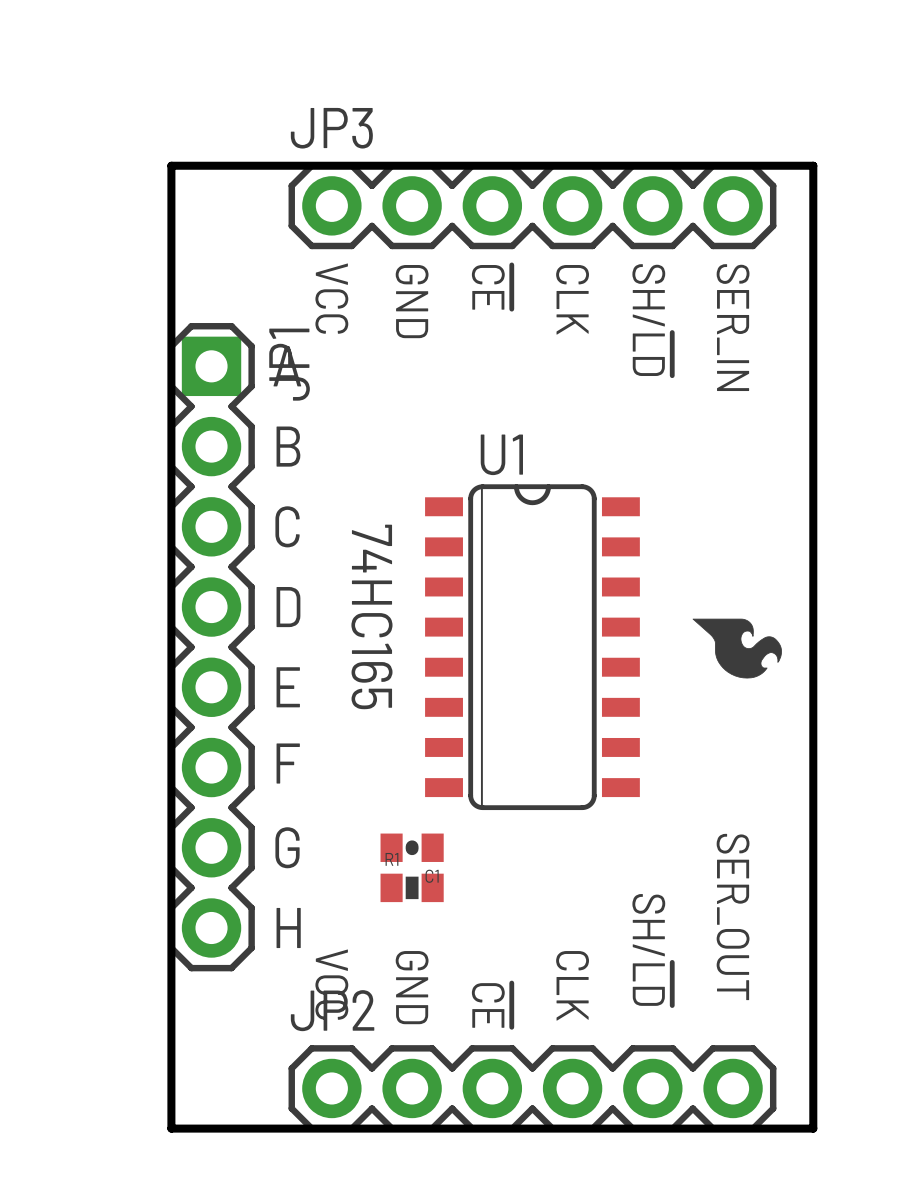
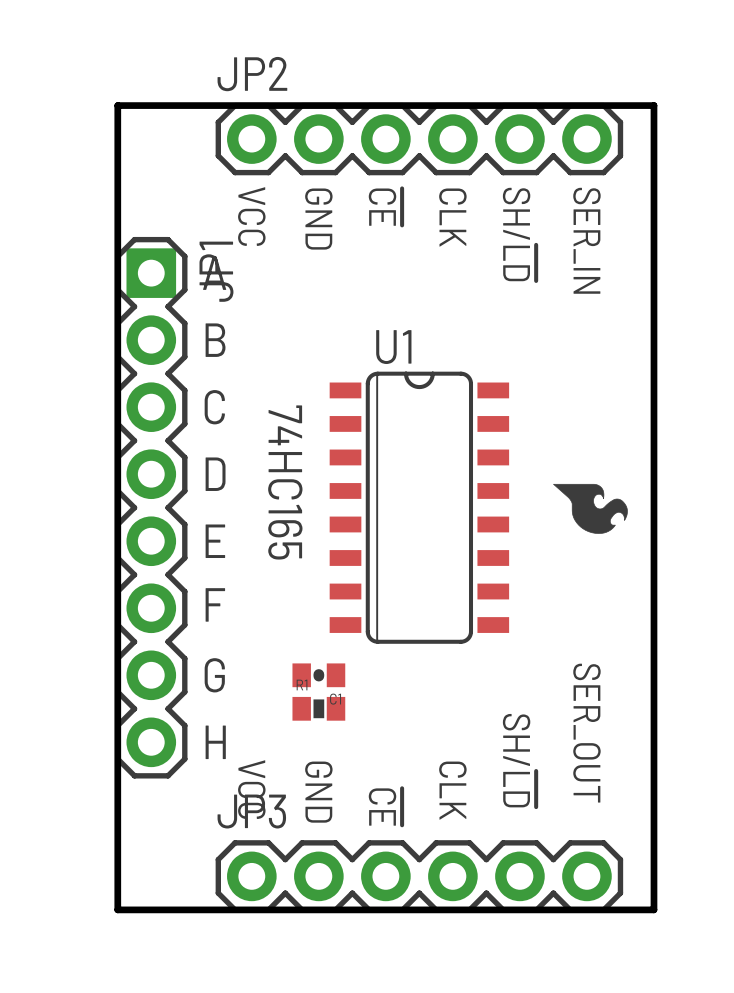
JP3 name: JP3 (331, 128) -> JP2 (252, 74)
JP2 name: JP2 (332, 1010) -> JP3 (251, 811)

